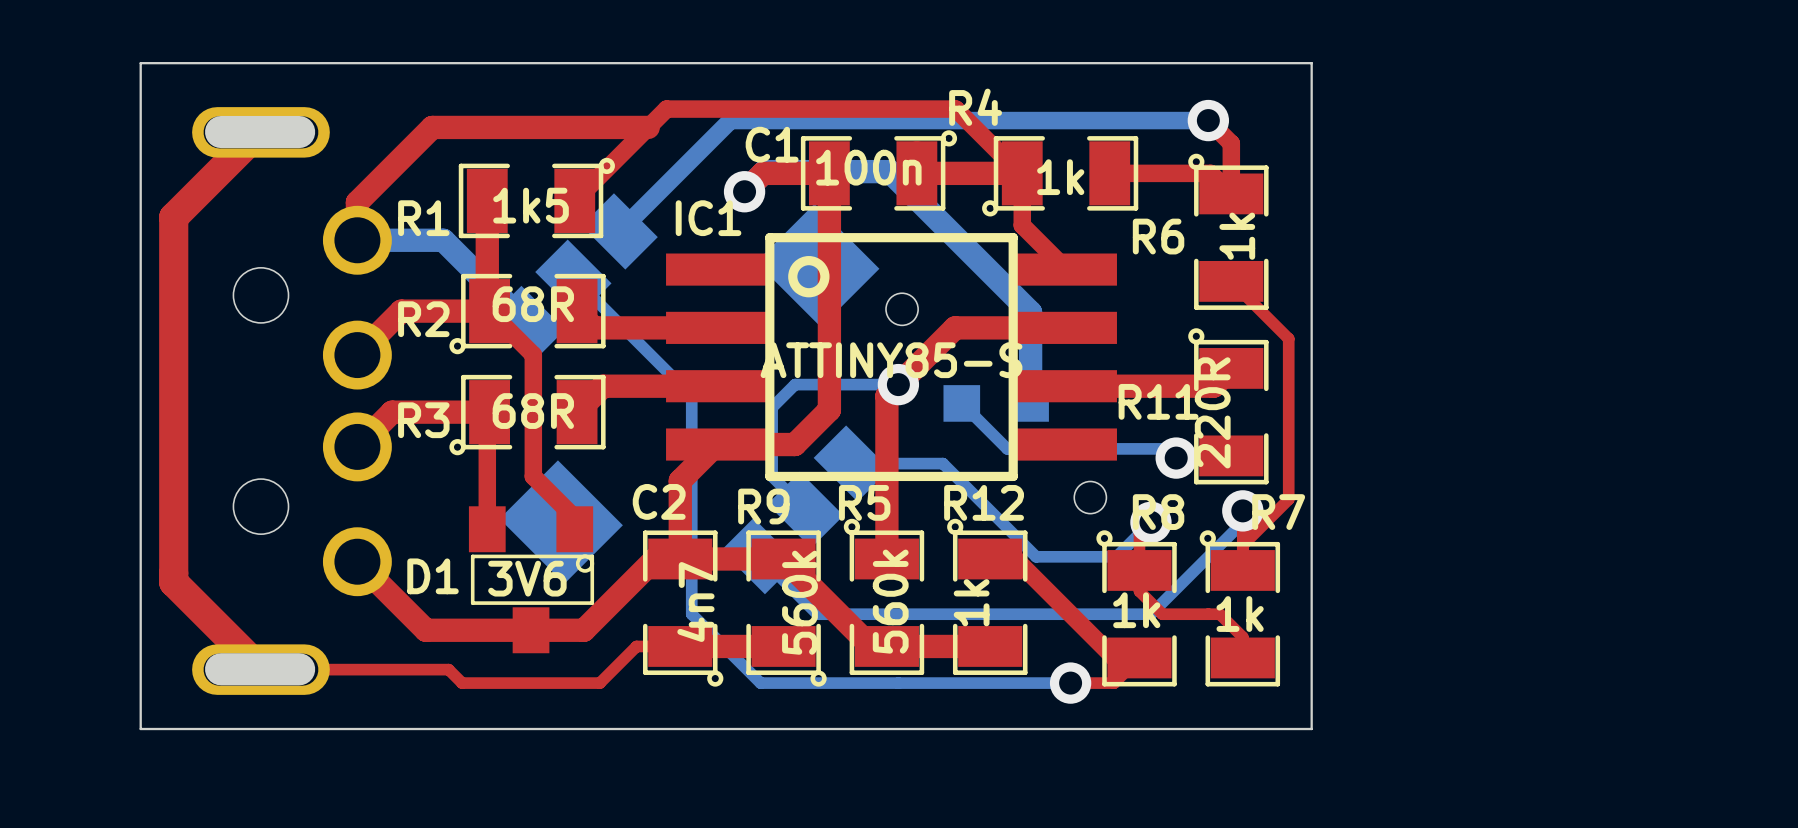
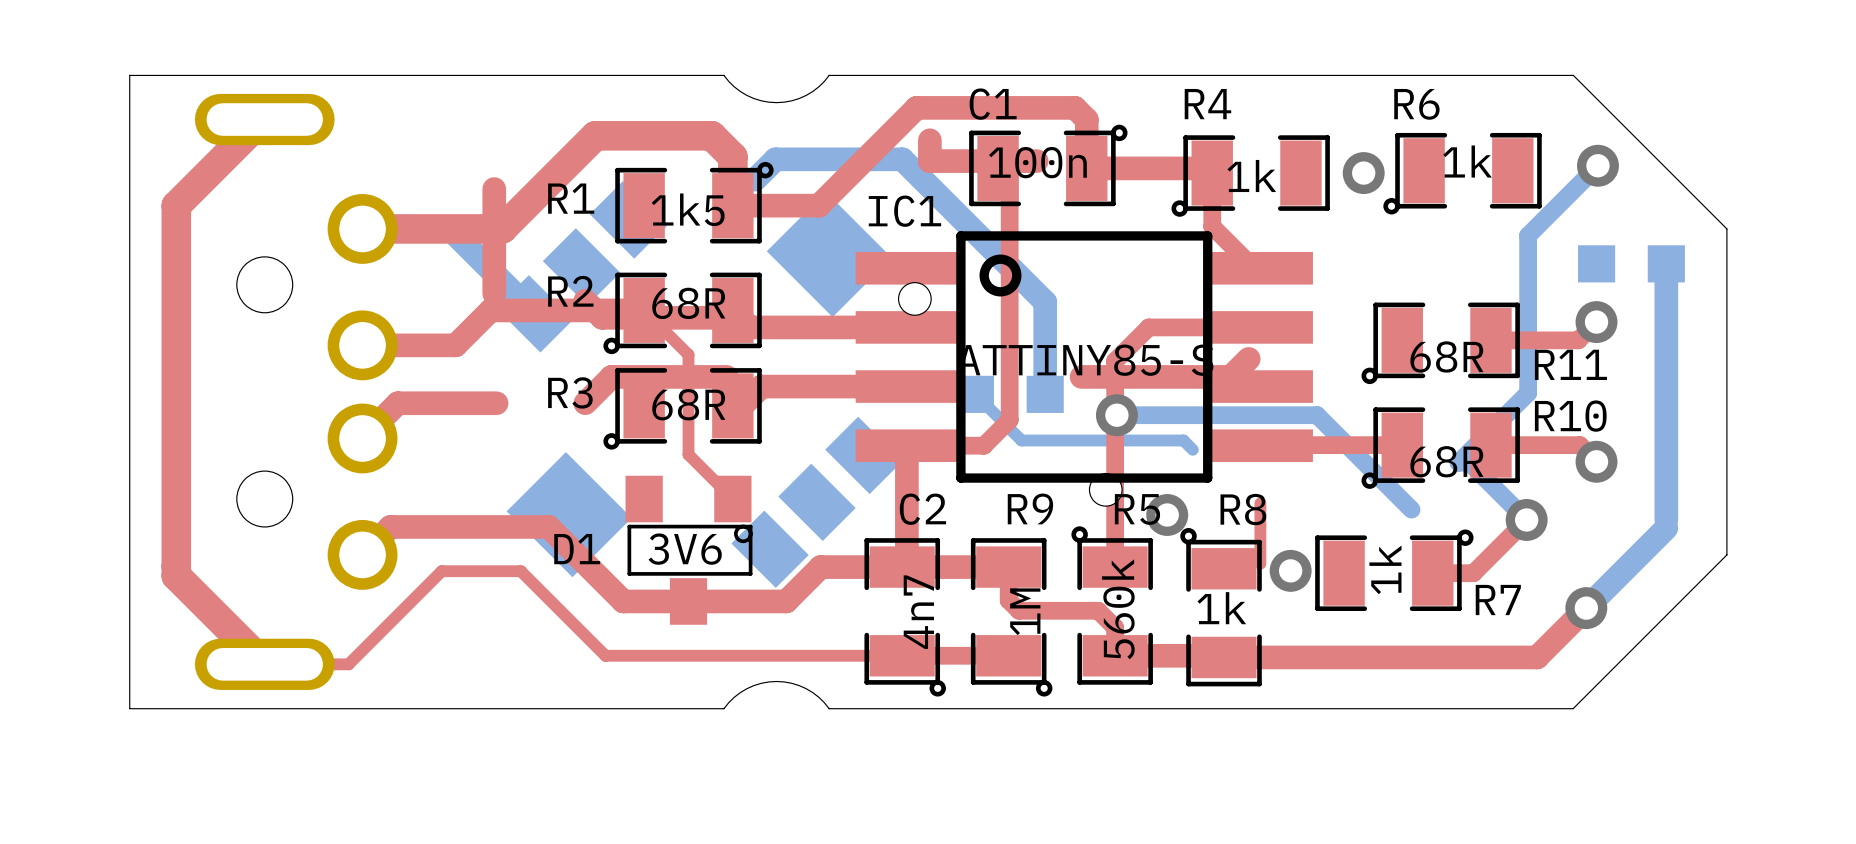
board edge: (140, 63) (1311, 63) (1311, 729) (140, 729) (140, 63) -> (129, 75) (129, 708) (723, 708) (734, 697) (746, 688) (761, 683) (776, 681) (791, 683) (806, 688) (818, 697) (829, 708) (1573, 708) (1726, 554) (1726, 228) (1573, 75) (829, 75) (818, 86) (806, 95) (791, 100) (776, 102) (761, 100) (746, 95) (734, 86) (723, 75) (129, 75)
R4 name position: R4 (975, 107) -> R4 (1207, 104)
top track: (1208, 120) (1231, 143) (1231, 193) (1210, 173) (1109, 173) -> none
bottom track: (1208, 120) (730, 120) (619, 231) -> none
via position: (1208, 120) -> (1363, 173)
top track: (648, 127) (432, 127) (357, 202) (357, 240) -> (1261, 268) (1254, 268) (1212, 226) (1212, 173) (1207, 168) (1086, 168) (1086, 119) (1074, 107) (916, 107) (818, 205) (732, 205) (732, 156) (711, 135) (595, 135) (502, 228) (362, 228)
board edge: (221, 132) (299, 132) -> none
C1 name position: C1 (772, 144) -> C1 (993, 104)
C1 position: (878, 170) -> (1048, 165)
R4 position: (1060, 176) -> (1250, 176)
bottom track: none -> (1597, 165) (1528, 235) (1528, 393) (1458, 462) (1469, 462) (1526, 519)
via: none -> (1597, 165)
top track: none -> (1009, 168) (1009, 419) (983, 445) (906, 445) (906, 562) (902, 567)
top track: (744, 191) (762, 173) (829, 173) (829, 409) (794, 444) (716, 444) (680, 480) (680, 558) -> none
via: (744, 191) -> none
R1 position: (536, 198) -> (694, 202)
top track: (574, 200) (666, 109) (955, 109) (1020, 173) (1022, 173) (1022, 225) (1066, 269) -> none
R1 name position: R1 (423, 218) -> R1 (571, 198)
IC1 name position: IC1 (708, 218) -> IC1 (904, 211)
R6 rotation: 0° (1228, 231) -> 90° counterclockwise (1462, 173)
R6 position: (1228, 231) -> (1462, 173)
part: none -> (1631, 263)
bottom track: none -> (1666, 263) (1666, 528) (1586, 608)
bottom track: (573, 277) (691, 396) (691, 614) (760, 683) (1070, 683) -> none
top track: (1231, 281) (1288, 338) (1288, 499) (1242, 545) -> none
R2 position: (527, 314) -> (682, 313)
R2 name position: R2 (423, 319) -> R2 (570, 291)
top track: none -> (732, 310) (749, 327) (906, 327)
top track: (1066, 327) (955, 327) (886, 396) (886, 558) -> none
top track: none -> (1596, 322) (1578, 340) (1490, 340)
via: none -> (1596, 322)
top track: none -> (1261, 327) (1148, 327) (1115, 361) (1115, 567)
top track: (357, 355) (401, 311) (489, 311) (533, 354) (533, 476) (574, 517) (574, 529) -> (362, 345) (455, 345) (490, 310) (644, 310) (688, 354) (688, 454) (732, 499)
IC1 position: (891, 357) -> (1084, 356)
bottom track: (898, 384) (795, 384) (772, 407) (772, 476) (805, 509) -> none
via: (898, 384) -> none
top track: none -> (906, 386) (761, 386) (732, 415)
R11 name position: R11 (1158, 401) -> R11 (1570, 364)
R11 rotation: 0° (1228, 406) -> 90° counterclockwise (1440, 343)
R11 position: (1228, 406) -> (1440, 343)
R11 value: 220R (1212, 412) -> 68R (1446, 356)
R3 position: (527, 415) -> (682, 408)
R3 name position: R3 (423, 420) -> R3 (570, 392)
bottom track: none -> (1116, 415) (1317, 415) (1411, 509)
via: none -> (1116, 415)
top track: (487, 430) (487, 529) -> none
top track: none -> (1262, 445) (1402, 445)
top track: none -> (1490, 445) (1579, 445) (1596, 461)
R10: none -> 68R (1440, 448)
via: (1176, 458) -> none
bottom track: (851, 463) (942, 463) (1036, 556) (1116, 556) (1150, 522) -> none
via: none -> (1596, 461)
C2 name position: C2 (659, 501) -> C2 (922, 509)
R5 name position: R5 (864, 502) -> R5 (1137, 509)
R9 name position: R9 (763, 506) -> R9 (1030, 508)
bottom track: (1242, 510) (1242, 522) (1150, 614) (817, 614) (759, 556) -> none
via position: (1242, 510) -> (1290, 570)
top track: (1150, 522) (1139, 533) (1139, 591) (1162, 614) (1219, 614) (1242, 637) (1242, 657) -> none
top track: none -> (1526, 519) (1473, 573) (1432, 573)
via: none -> (1526, 519)
top track: (990, 558) (1015, 558) (1114, 657) (1139, 657) (1114, 683) (1070, 683) -> none
top track: (357, 561) (425, 630) (583, 630) (655, 558) (783, 558) (871, 646) (990, 646) -> (362, 554) (390, 526) (548, 526) (623, 601) (786, 601) (820, 567) (1008, 567) (1008, 600) (1019, 610) (1098, 610) (1115, 627) (1115, 655)
D1 name position: D1 (433, 576) -> D1 (577, 549)
D1 position: (531, 579) -> (689, 550)
R5 position: (884, 596) -> (1112, 605)
R12: 1k (987, 596) -> none
R9 value: 560k (799, 602) -> 1M (1025, 611)
C2 position: (683, 608) -> (905, 617)
R9 position: (786, 608) -> (1011, 617)
R8 position: (1136, 608) -> (1221, 607)
R7 rotation: 0° (1239, 608) -> 90° clockwise (1394, 570)
R7 position: (1239, 608) -> (1394, 570)
top track: none -> (1586, 608) (1536, 657) (1115, 655)
via: none -> (1586, 608)
top track: (783, 646) (636, 646) (599, 683) (462, 683) (448, 669) (343, 669) -> (1008, 655) (605, 655) (520, 571) (441, 571) (348, 664)
board edge: (221, 669) (299, 669) -> none
via: (1070, 683) -> none

